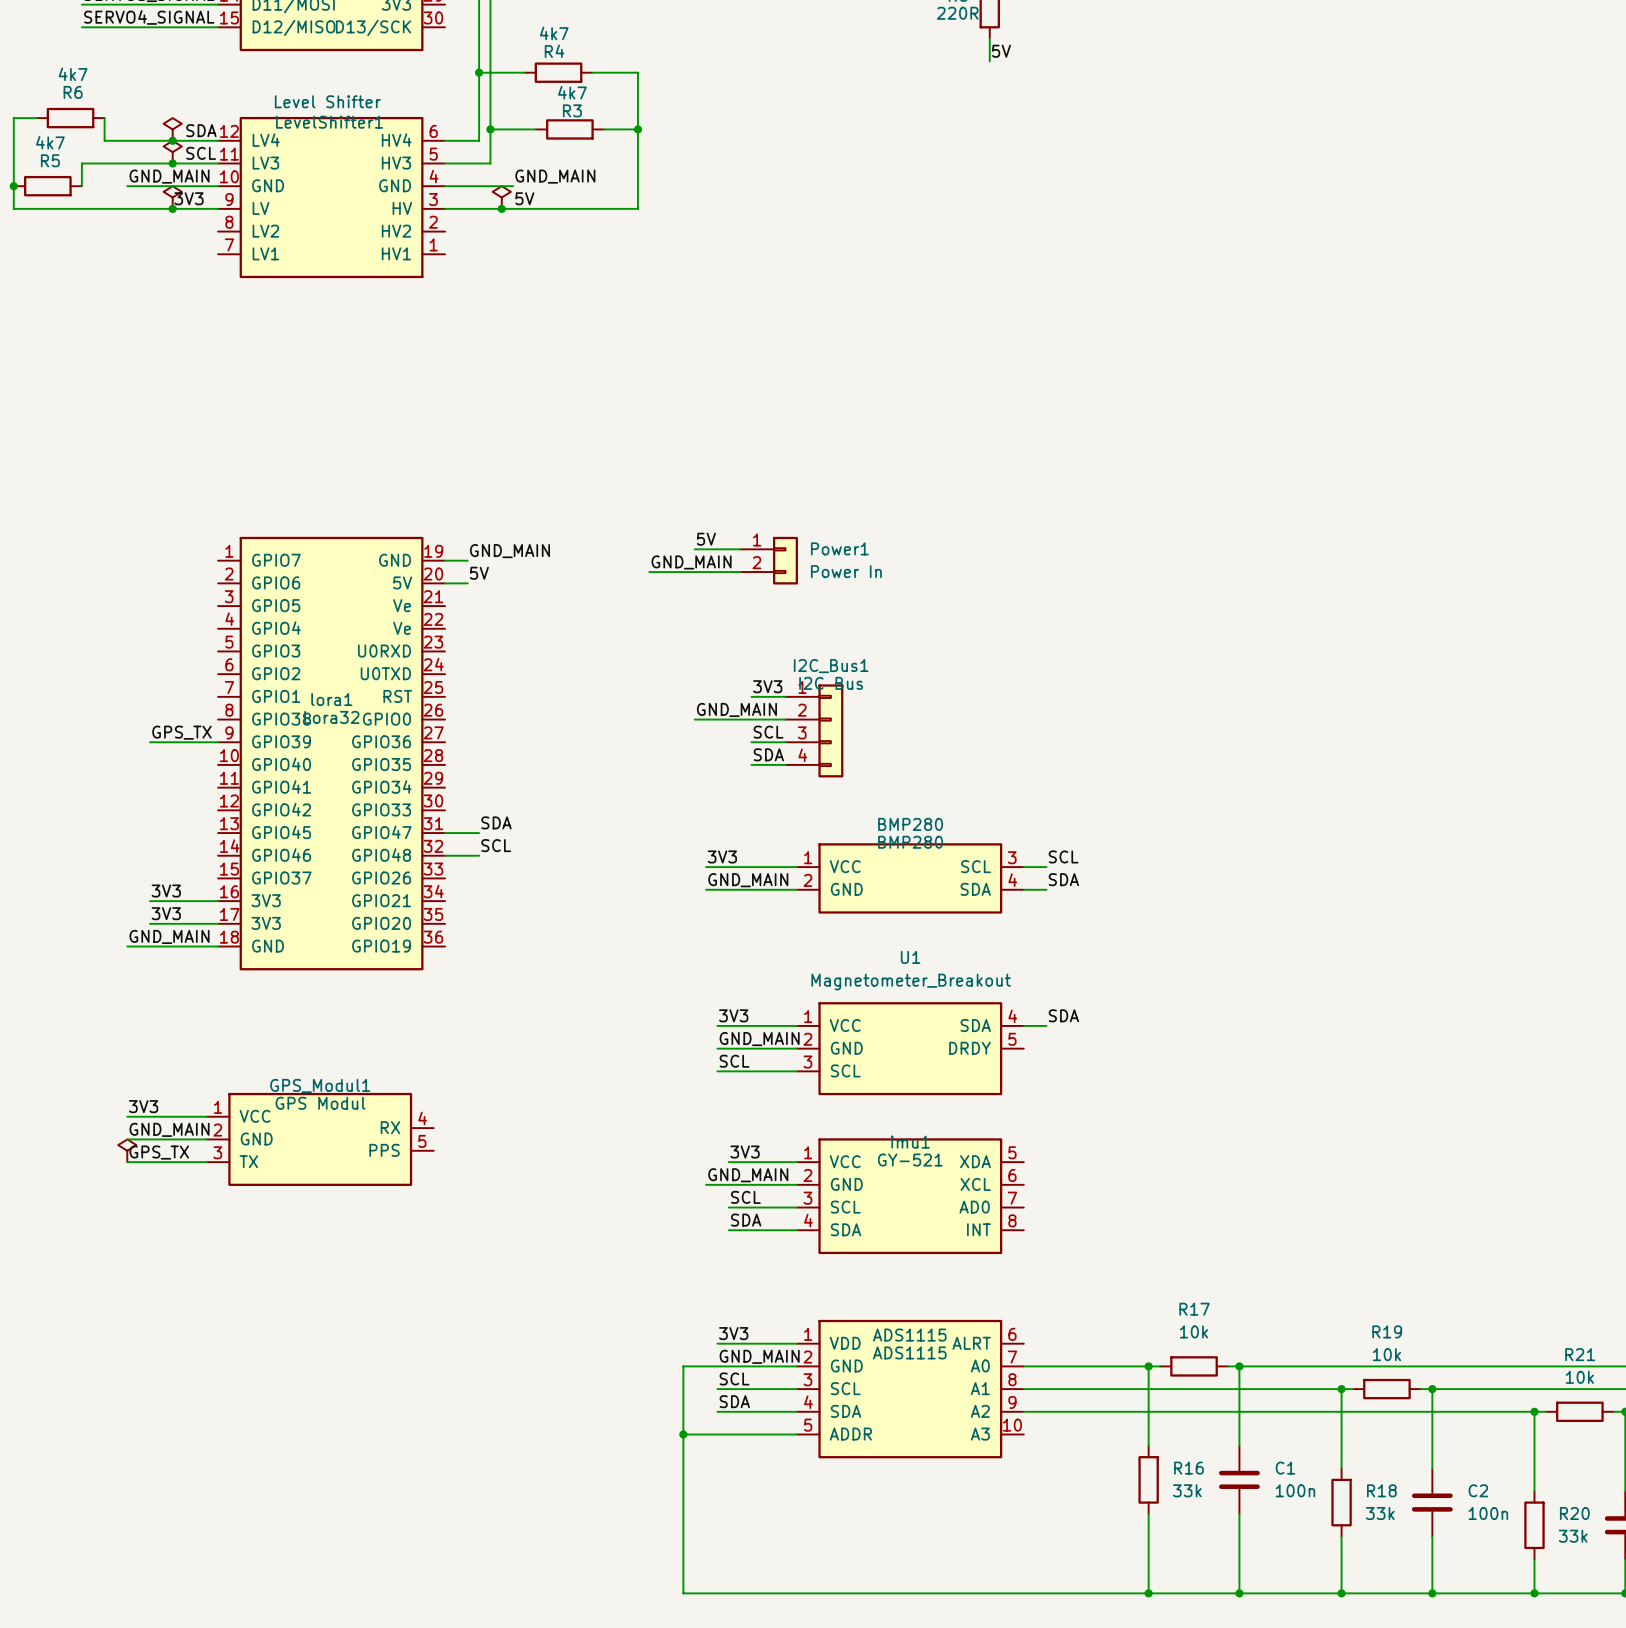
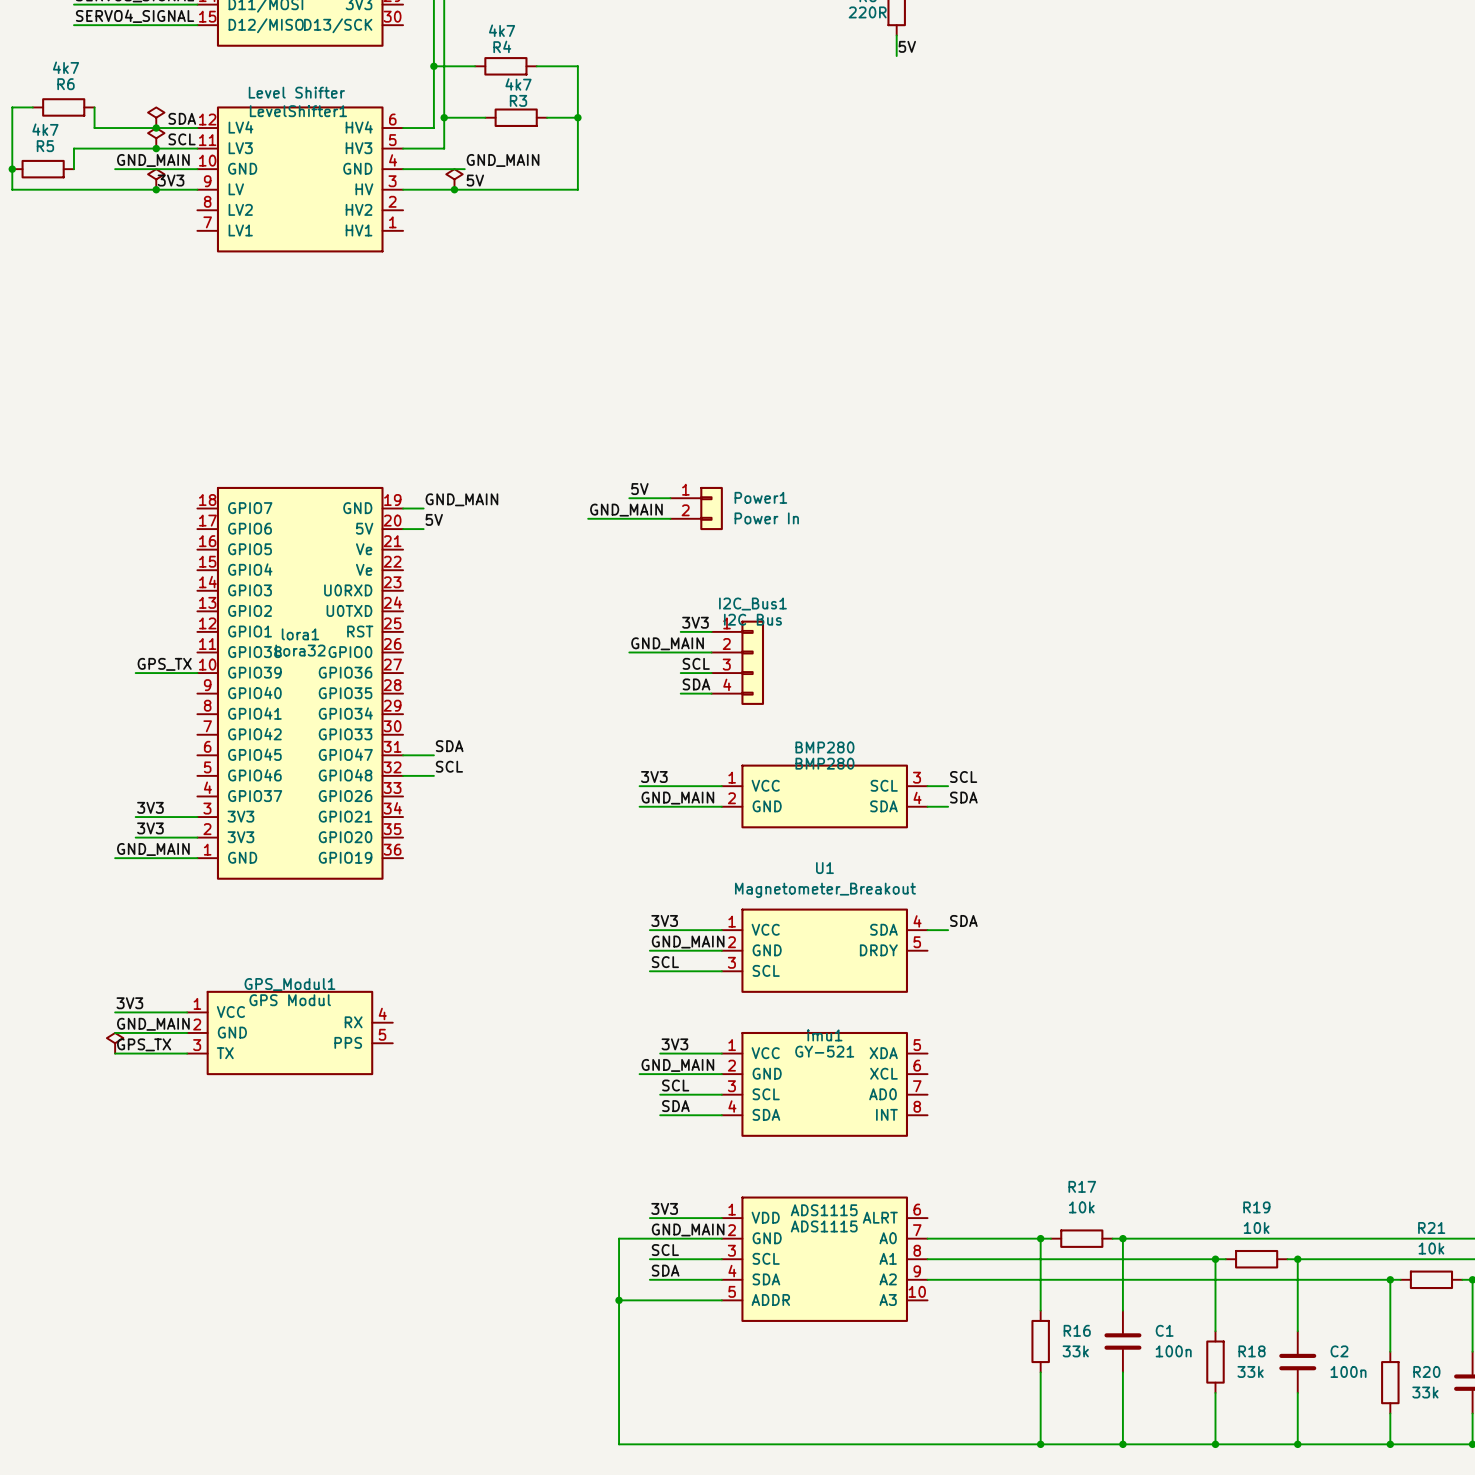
lora1 symbol: [218, 536, 446, 971] -> [197, 486, 404, 880]

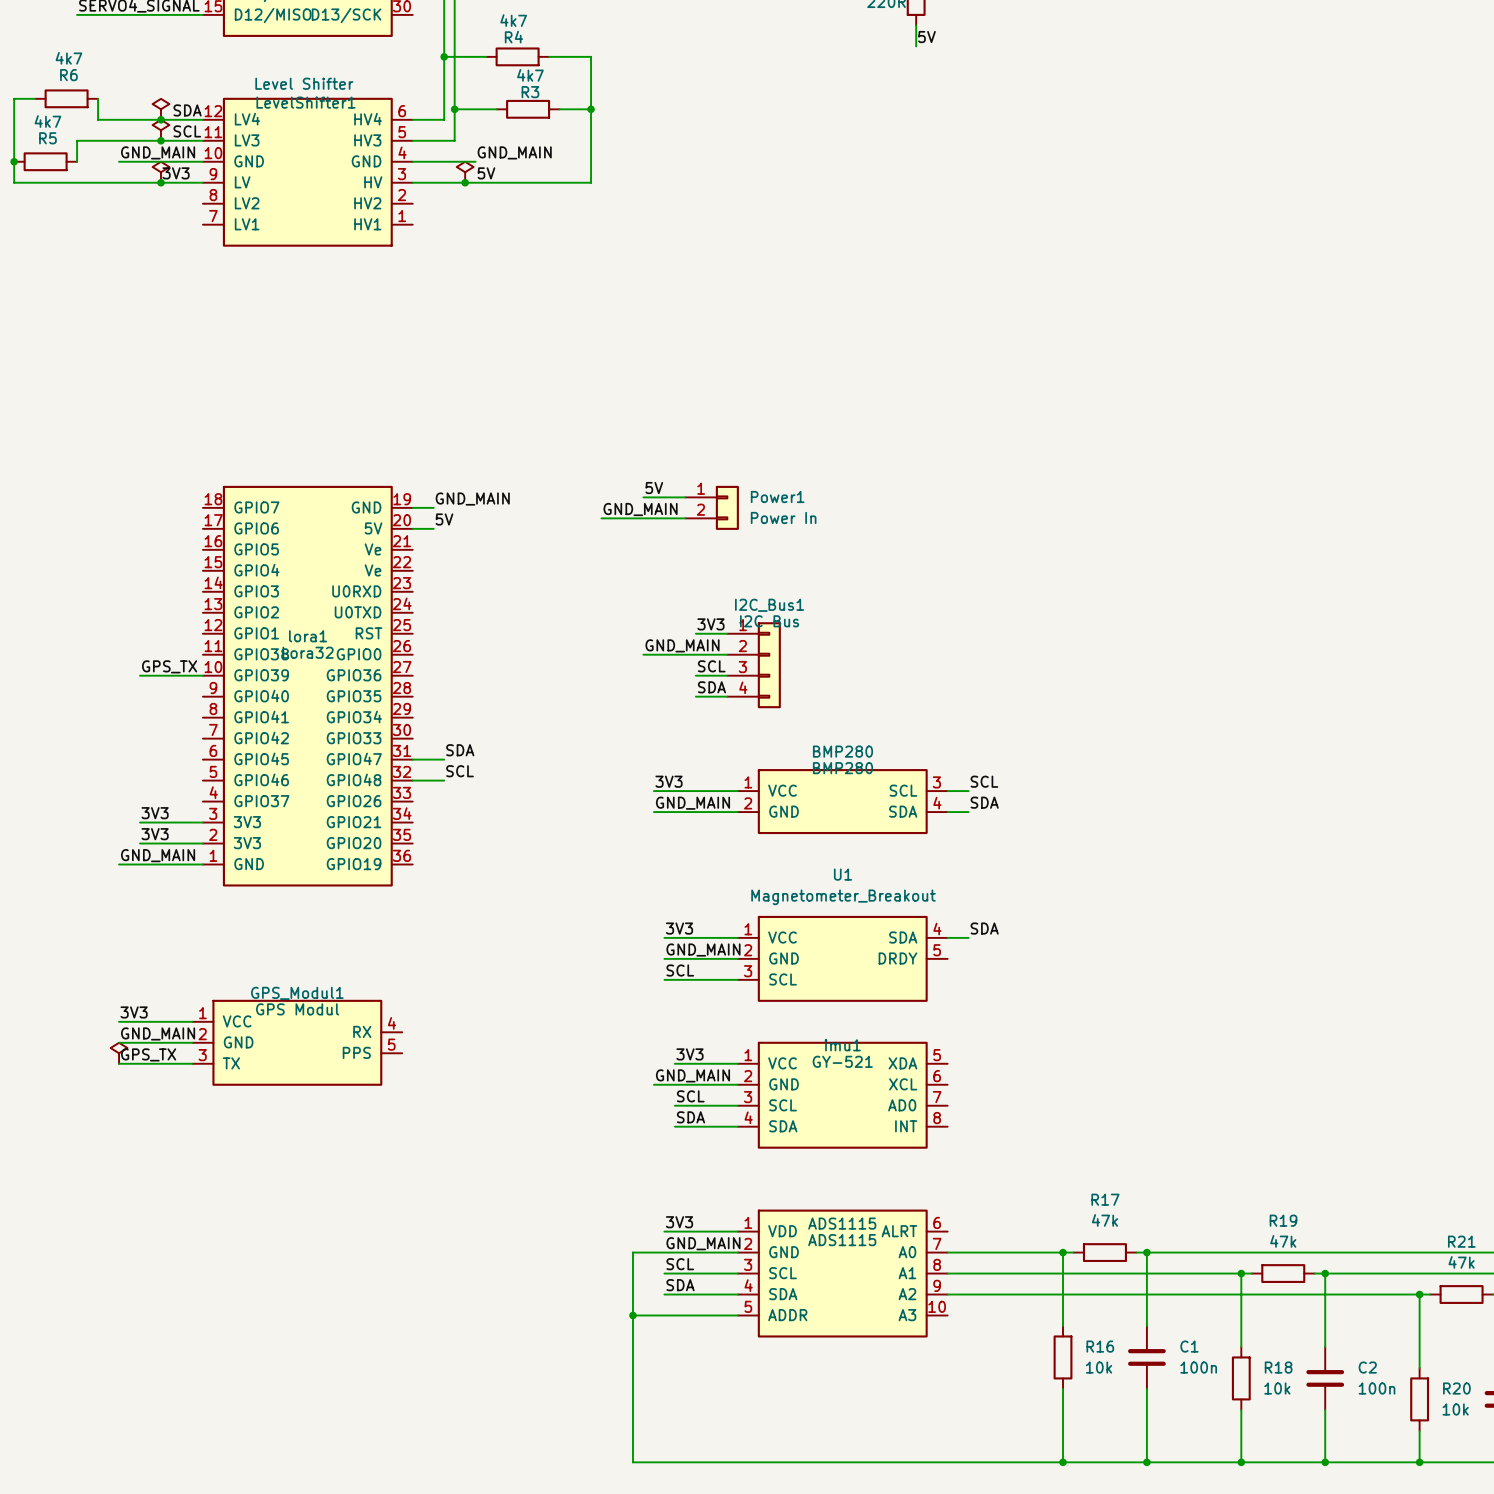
R17 value: 10k (1081, 1207) -> 47k (1104, 1220)
R19 value: 10k (1256, 1227) -> 47k (1283, 1241)
R21 value: 10k (1431, 1248) -> 47k (1461, 1262)
R16 value: 33k (1075, 1351) -> 10k (1099, 1367)
R18 value: 33k (1250, 1371) -> 10k (1277, 1388)
R20 value: 33k (1425, 1392) -> 10k (1455, 1409)

